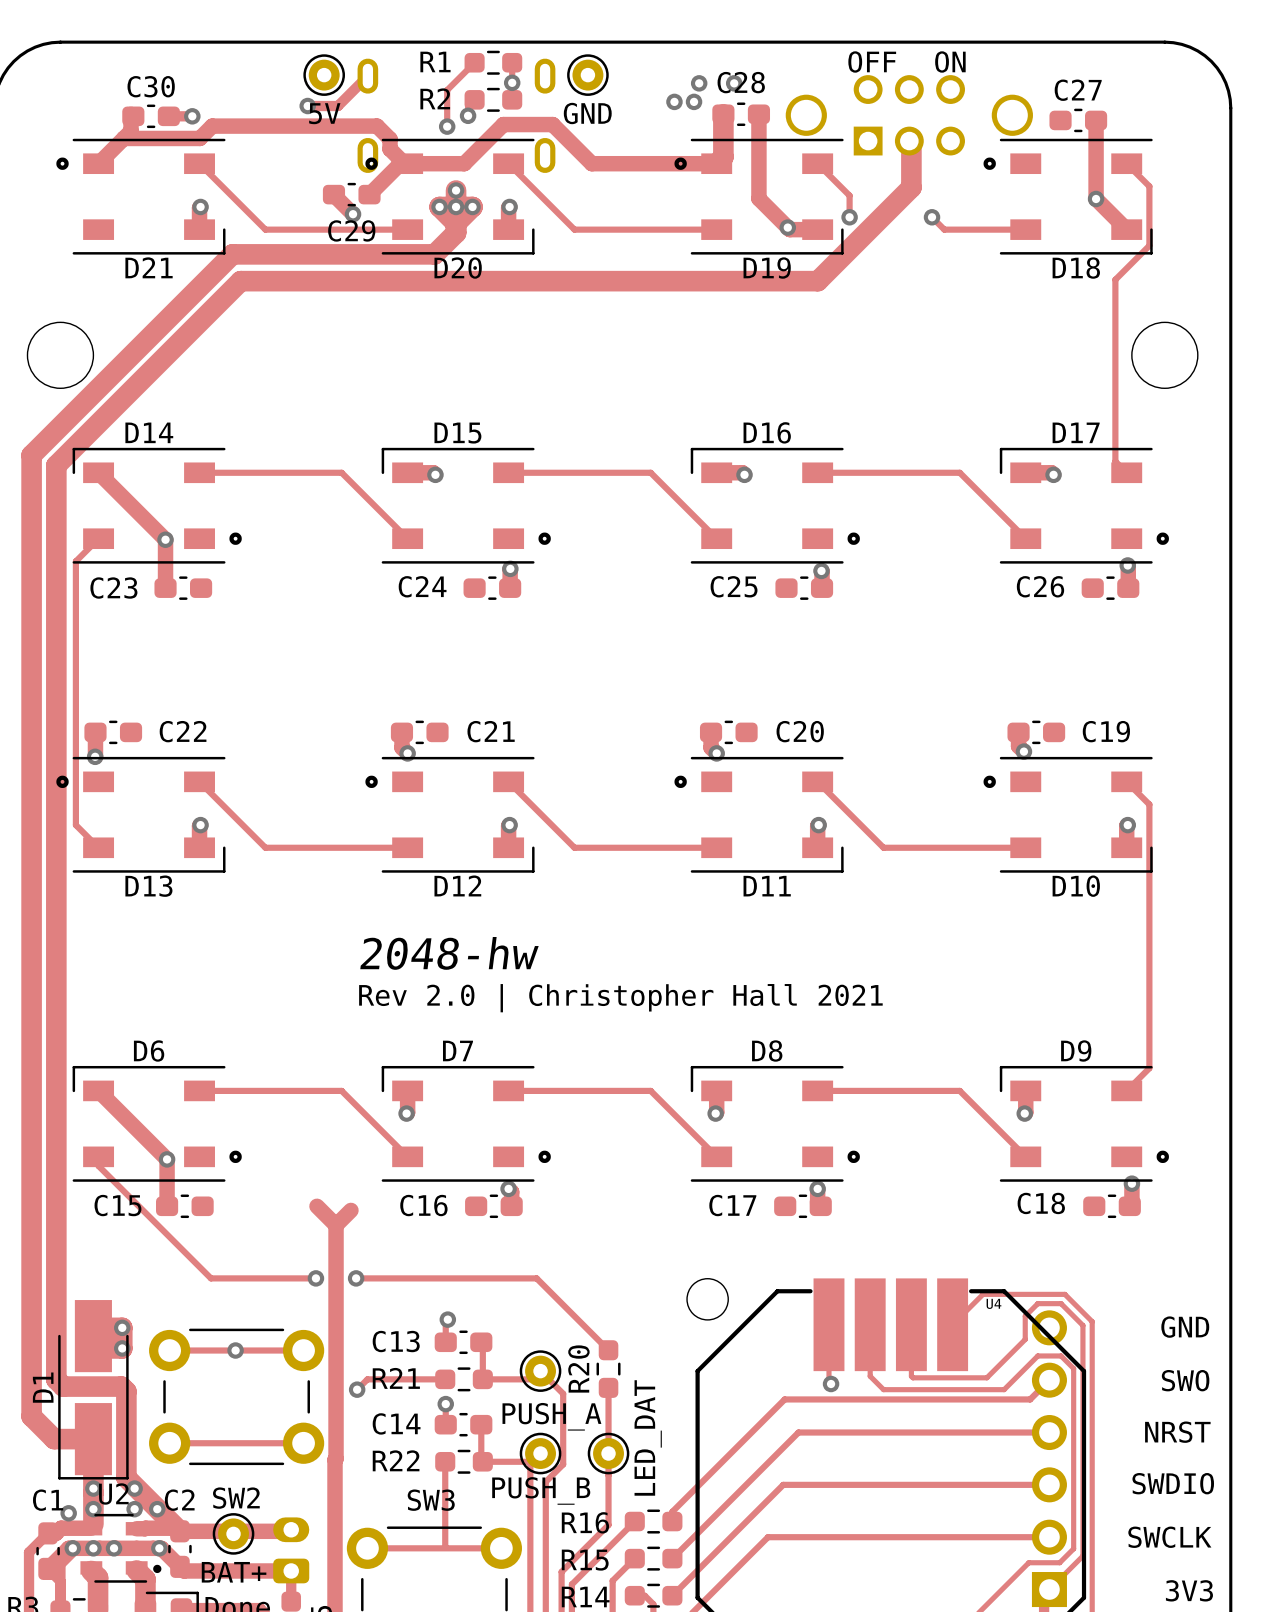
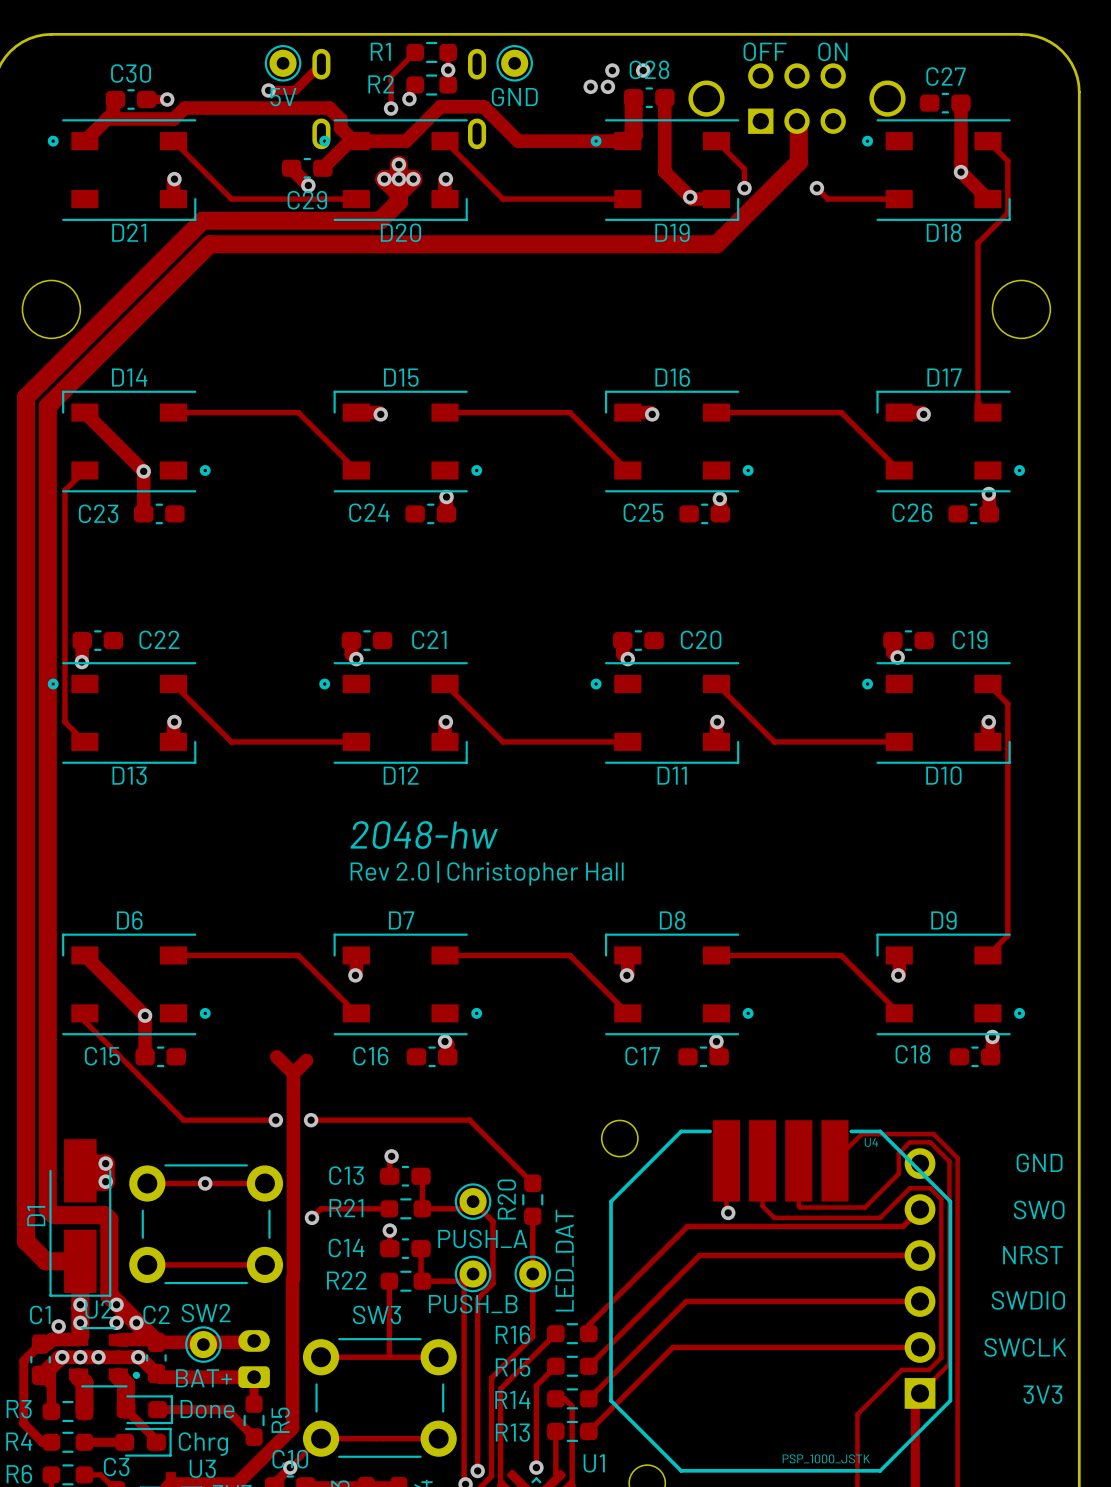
text position: 2048-hw (449, 953) -> 2048-hw (424, 835)
text: Rev 2.0 | Christopher Hall 2021 (620, 998) -> Rev 2.0 | Christopher Hall (487, 873)

